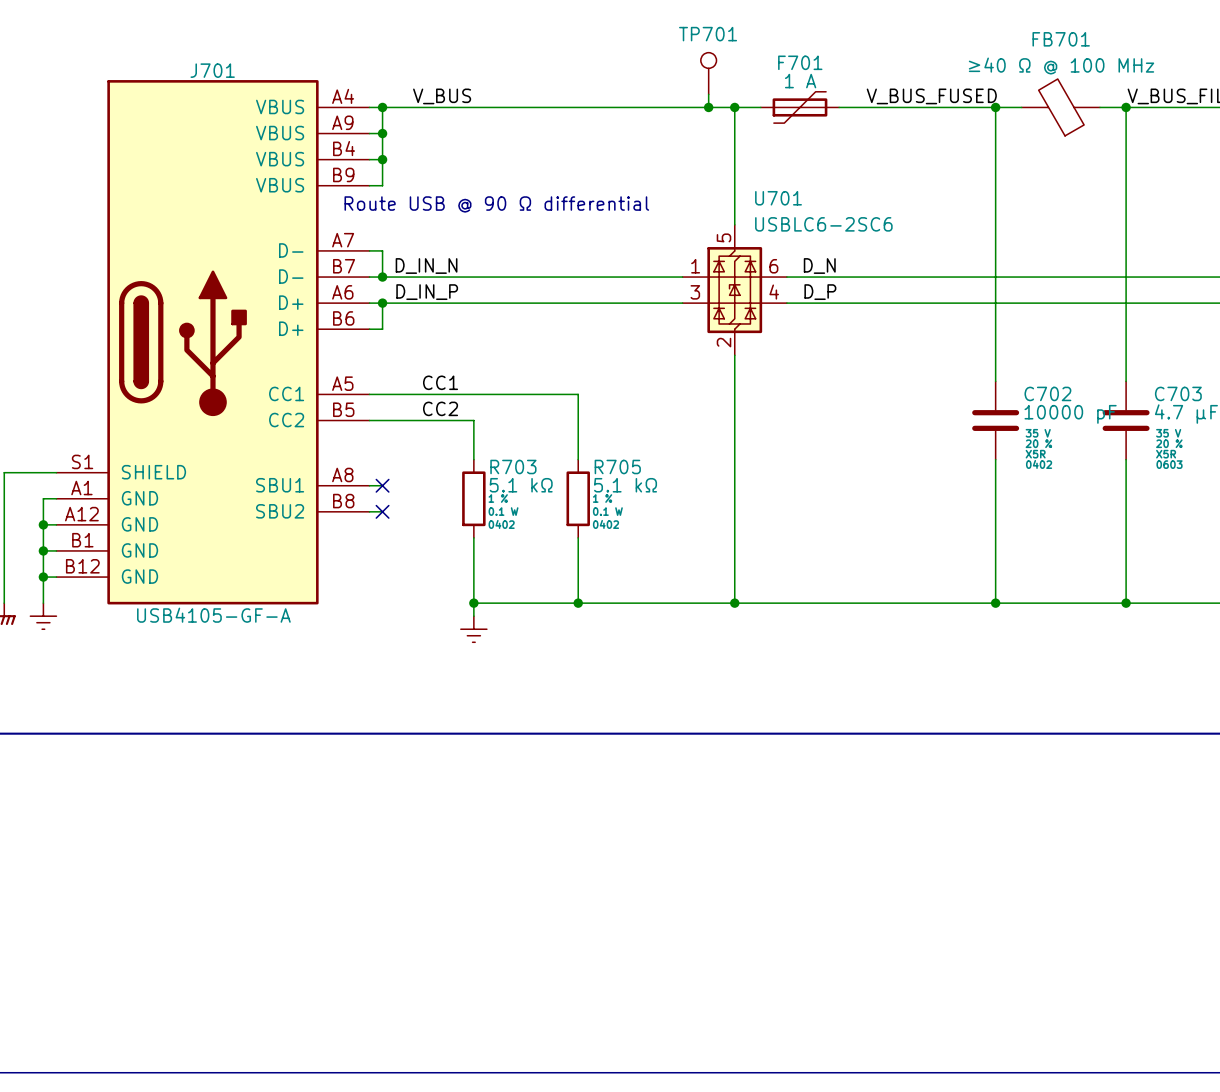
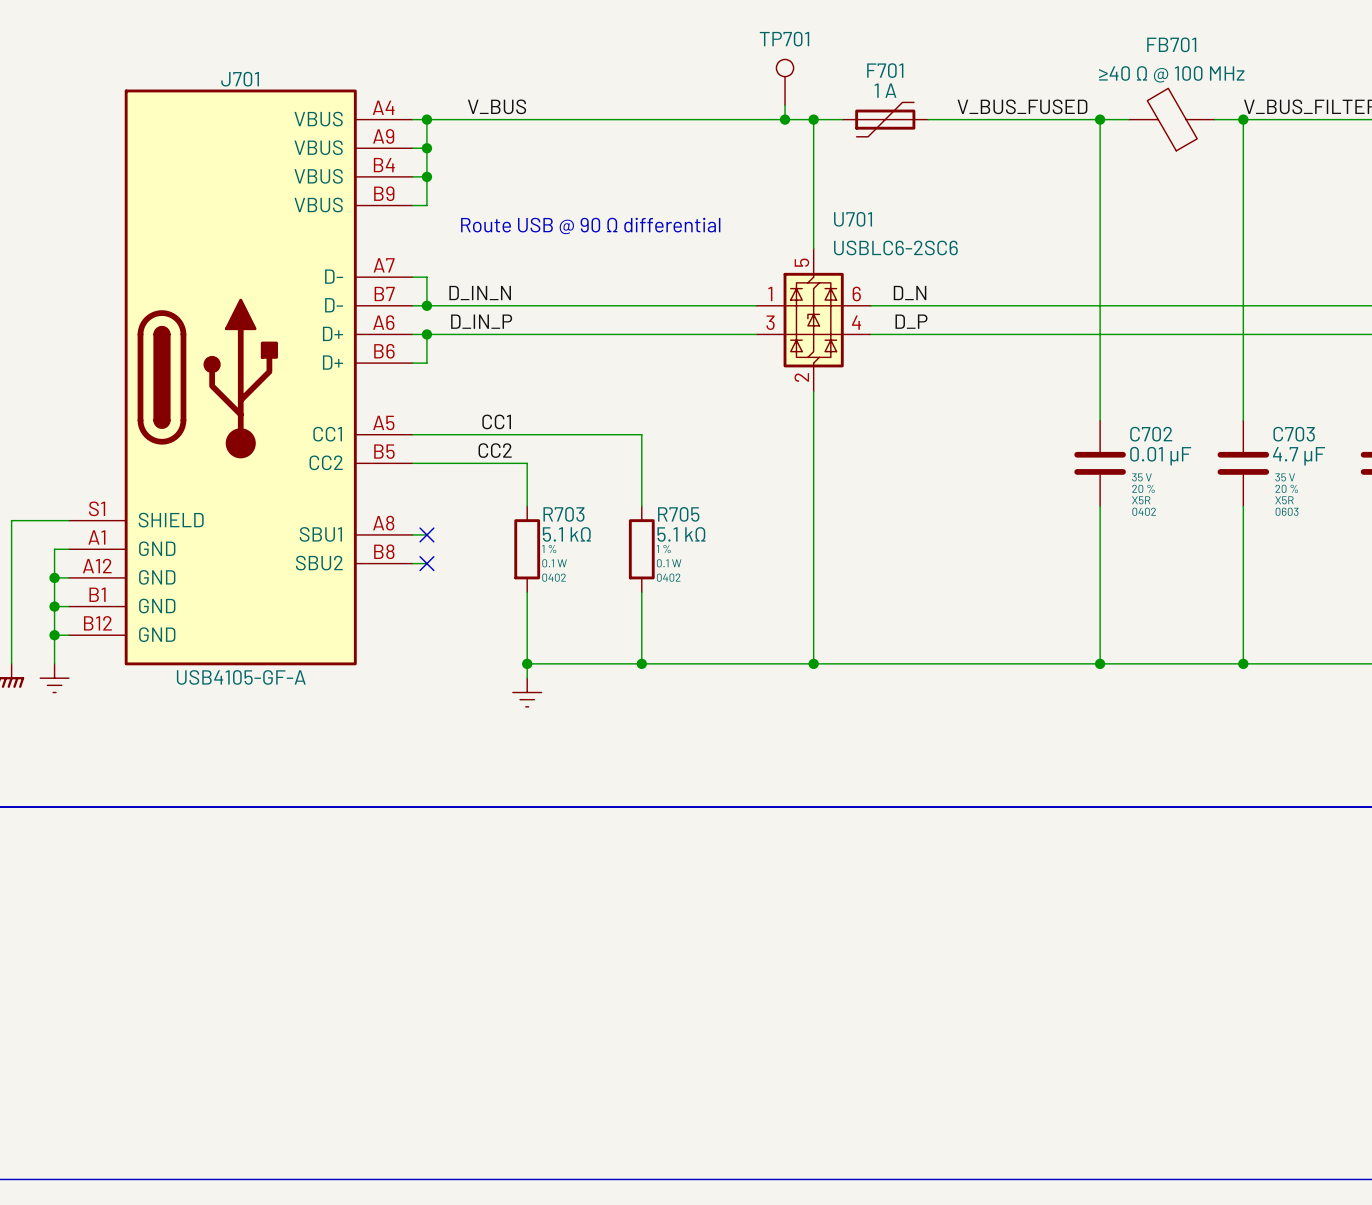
C702 value: 10000 pF (1070, 414) -> 0.01 µF (1160, 456)

